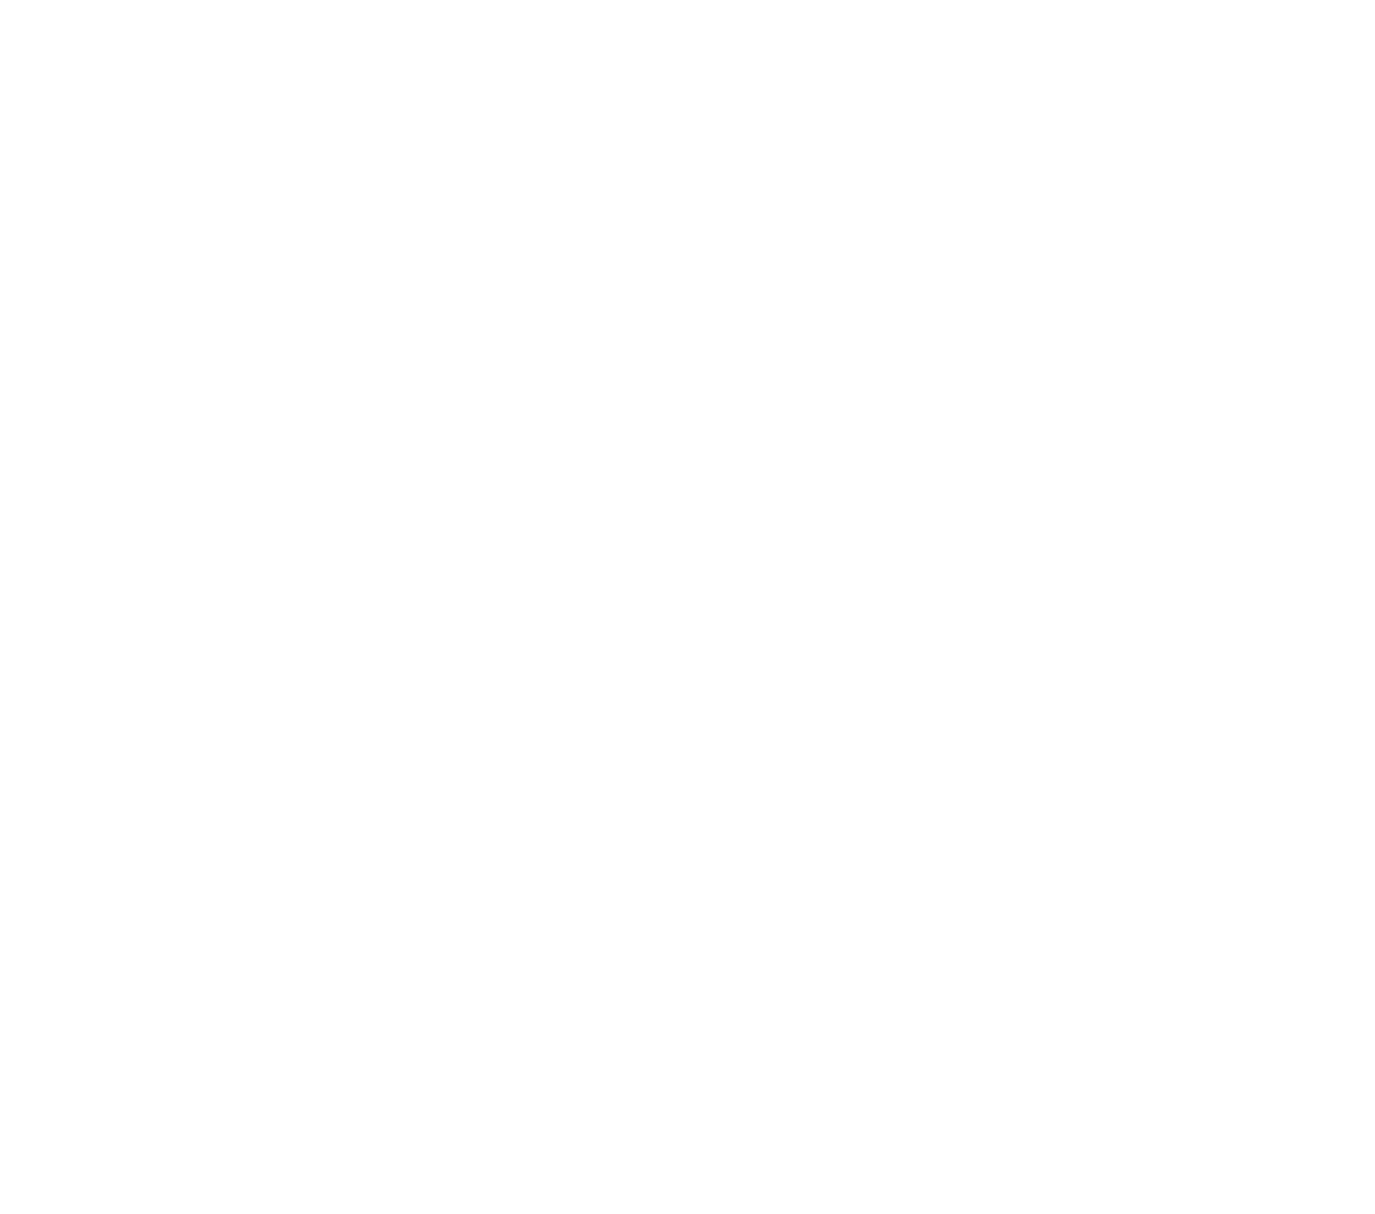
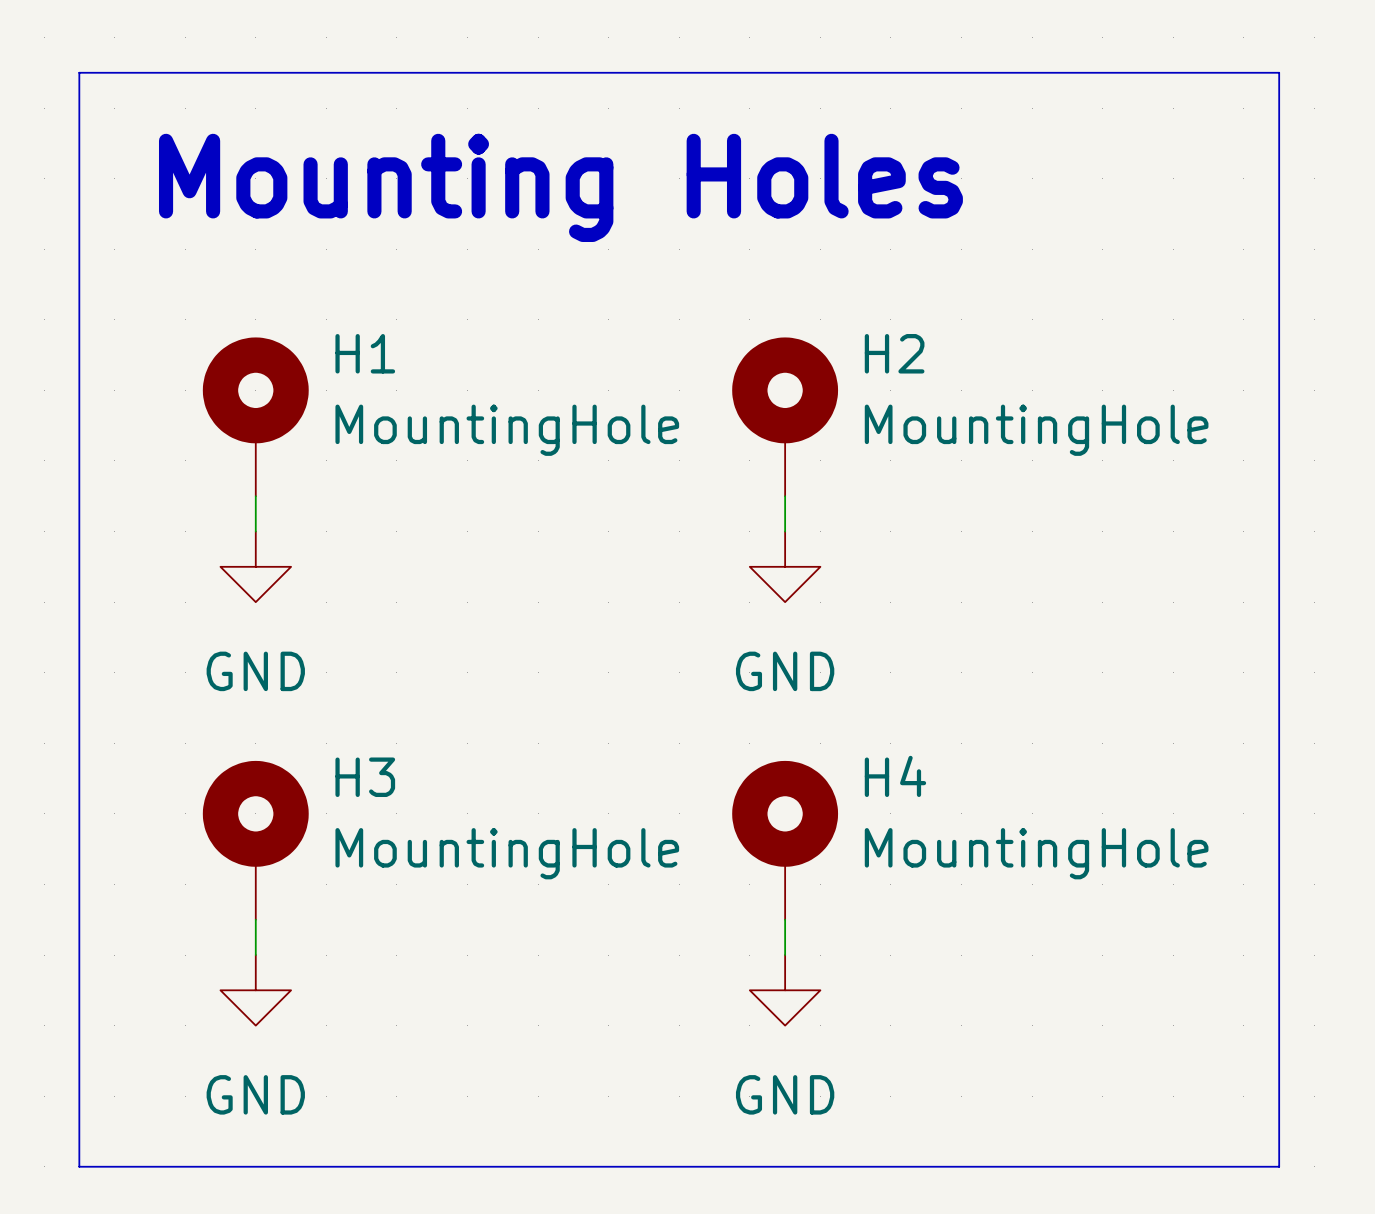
line: none -> (79, 72) (1279, 72) (1279, 1166) (79, 1166) (79, 72)
text: none -> Mounting Holes (560, 187)
H1: none -> MountingHole (255, 416)
H2: none -> MountingHole (785, 416)
wire: none -> (255, 496) (255, 531)
wire: none -> (785, 496) (785, 531)
power symbol: none -> GND (255, 566)
power symbol: none -> GND (785, 566)
H3: none -> MountingHole (255, 840)
H4: none -> MountingHole (785, 840)
wire: none -> (255, 919) (255, 955)
wire: none -> (785, 919) (785, 955)
power symbol: none -> GND (255, 990)
power symbol: none -> GND (785, 990)

